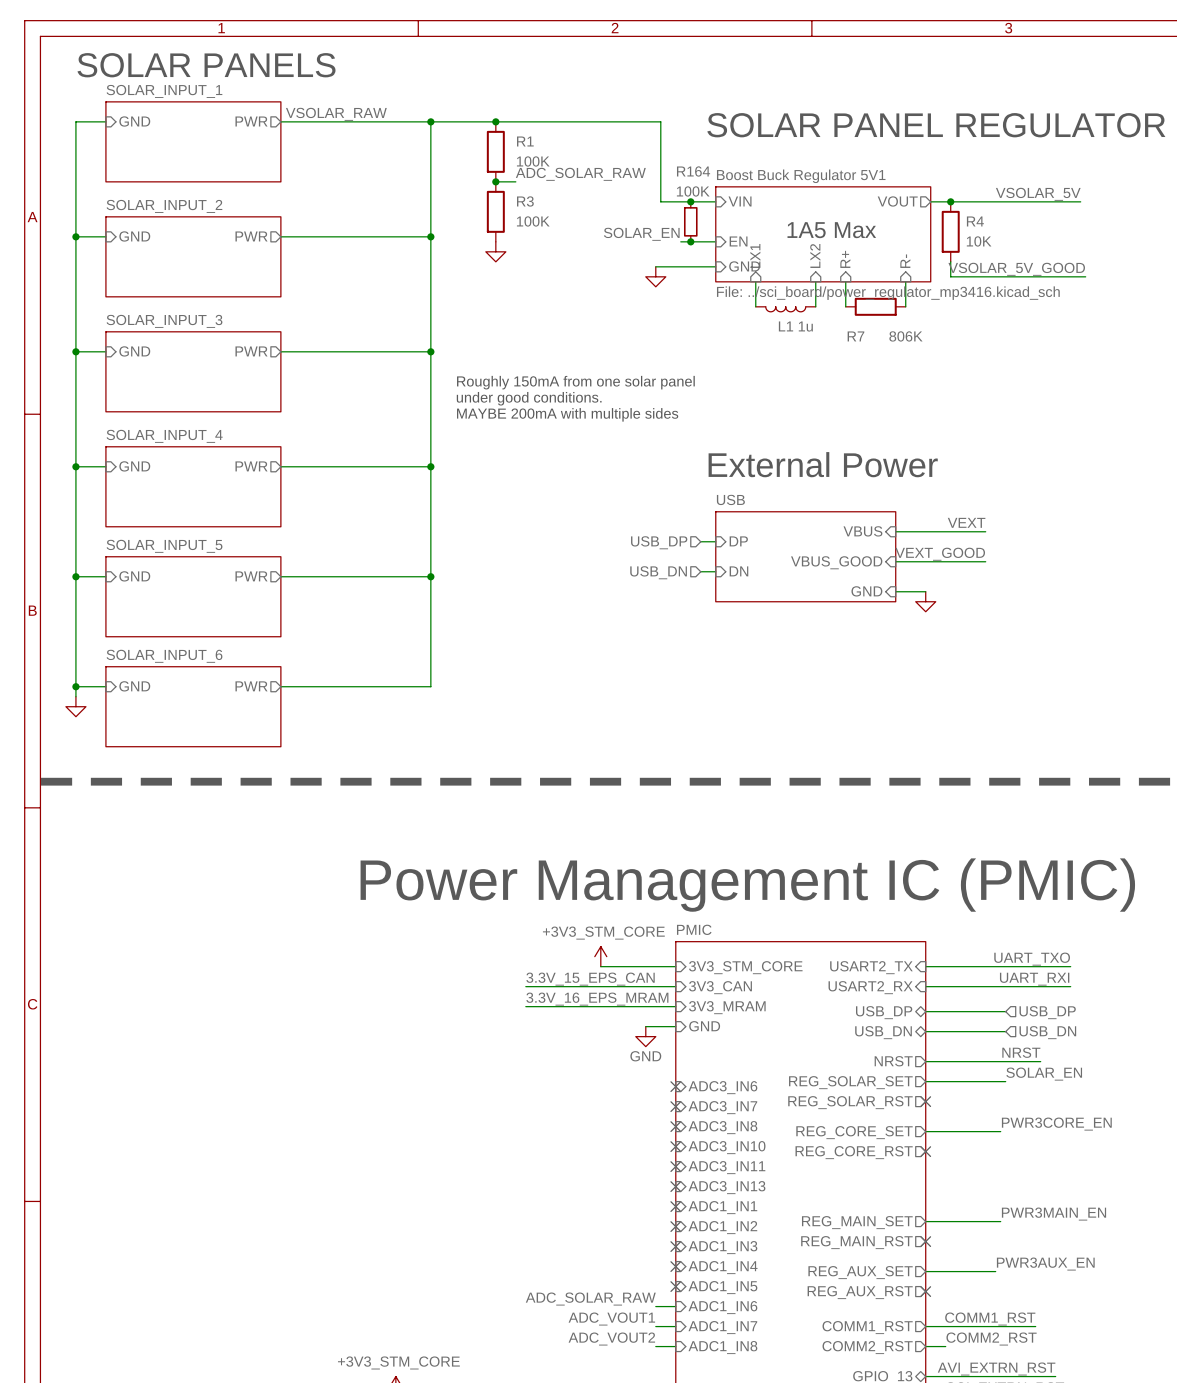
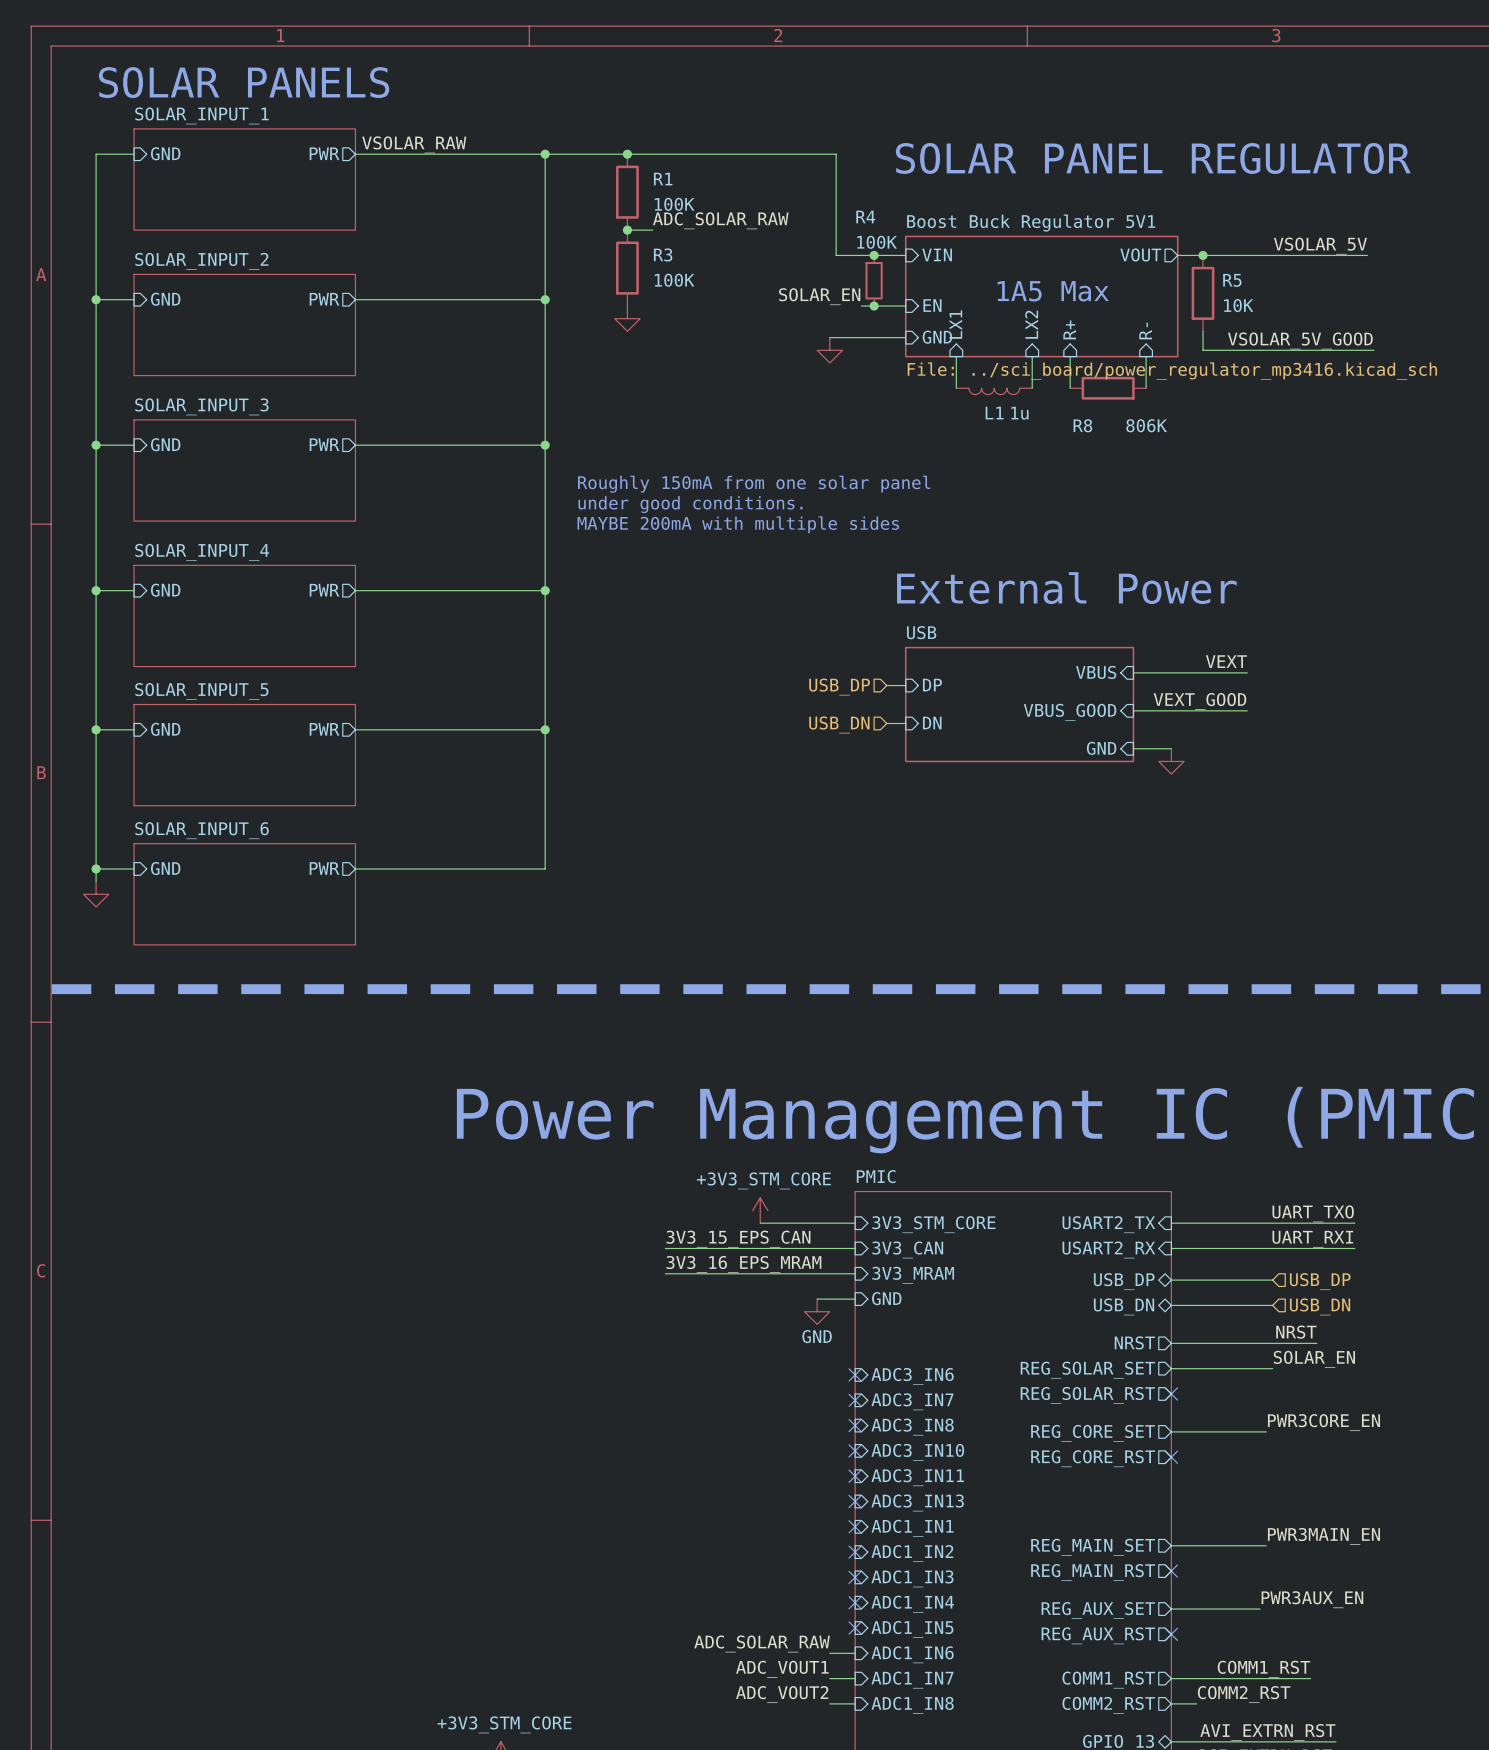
R164 name: R164 (693, 171) -> R4 (865, 217)
R4 name: R4 (975, 221) -> R5 (1232, 280)
R7 name: R7 (855, 336) -> R8 (1082, 425)
label: 3.3V_15_EPS_CAN (590, 979) -> 3V3_15_EPS_CAN (738, 1239)
label: 3.3V_16_EPS_MRAM (597, 999) -> 3V3_16_EPS_MRAM (743, 1264)

